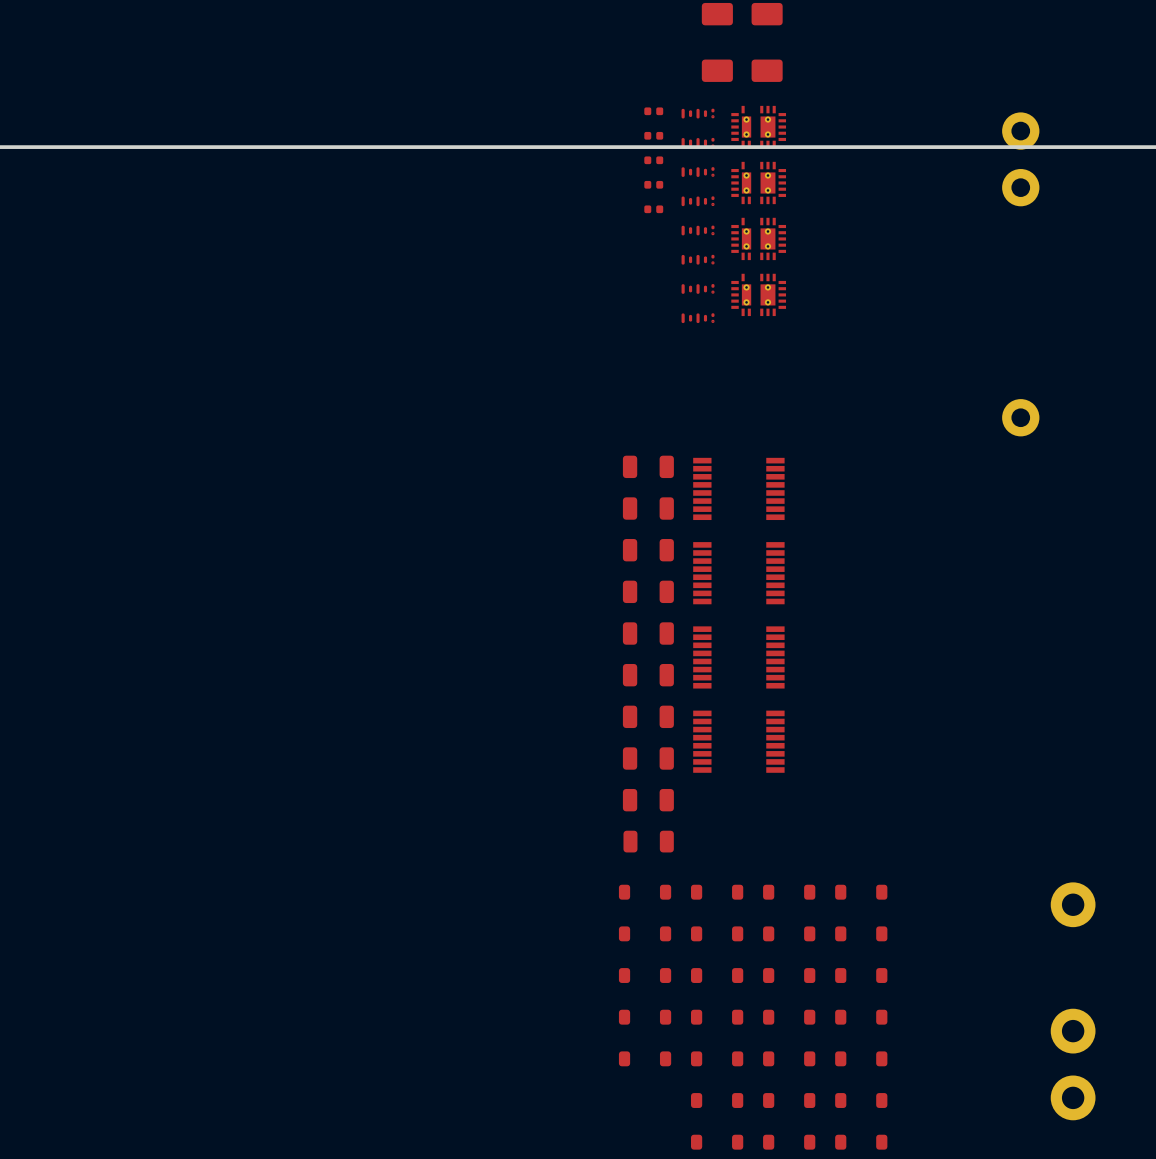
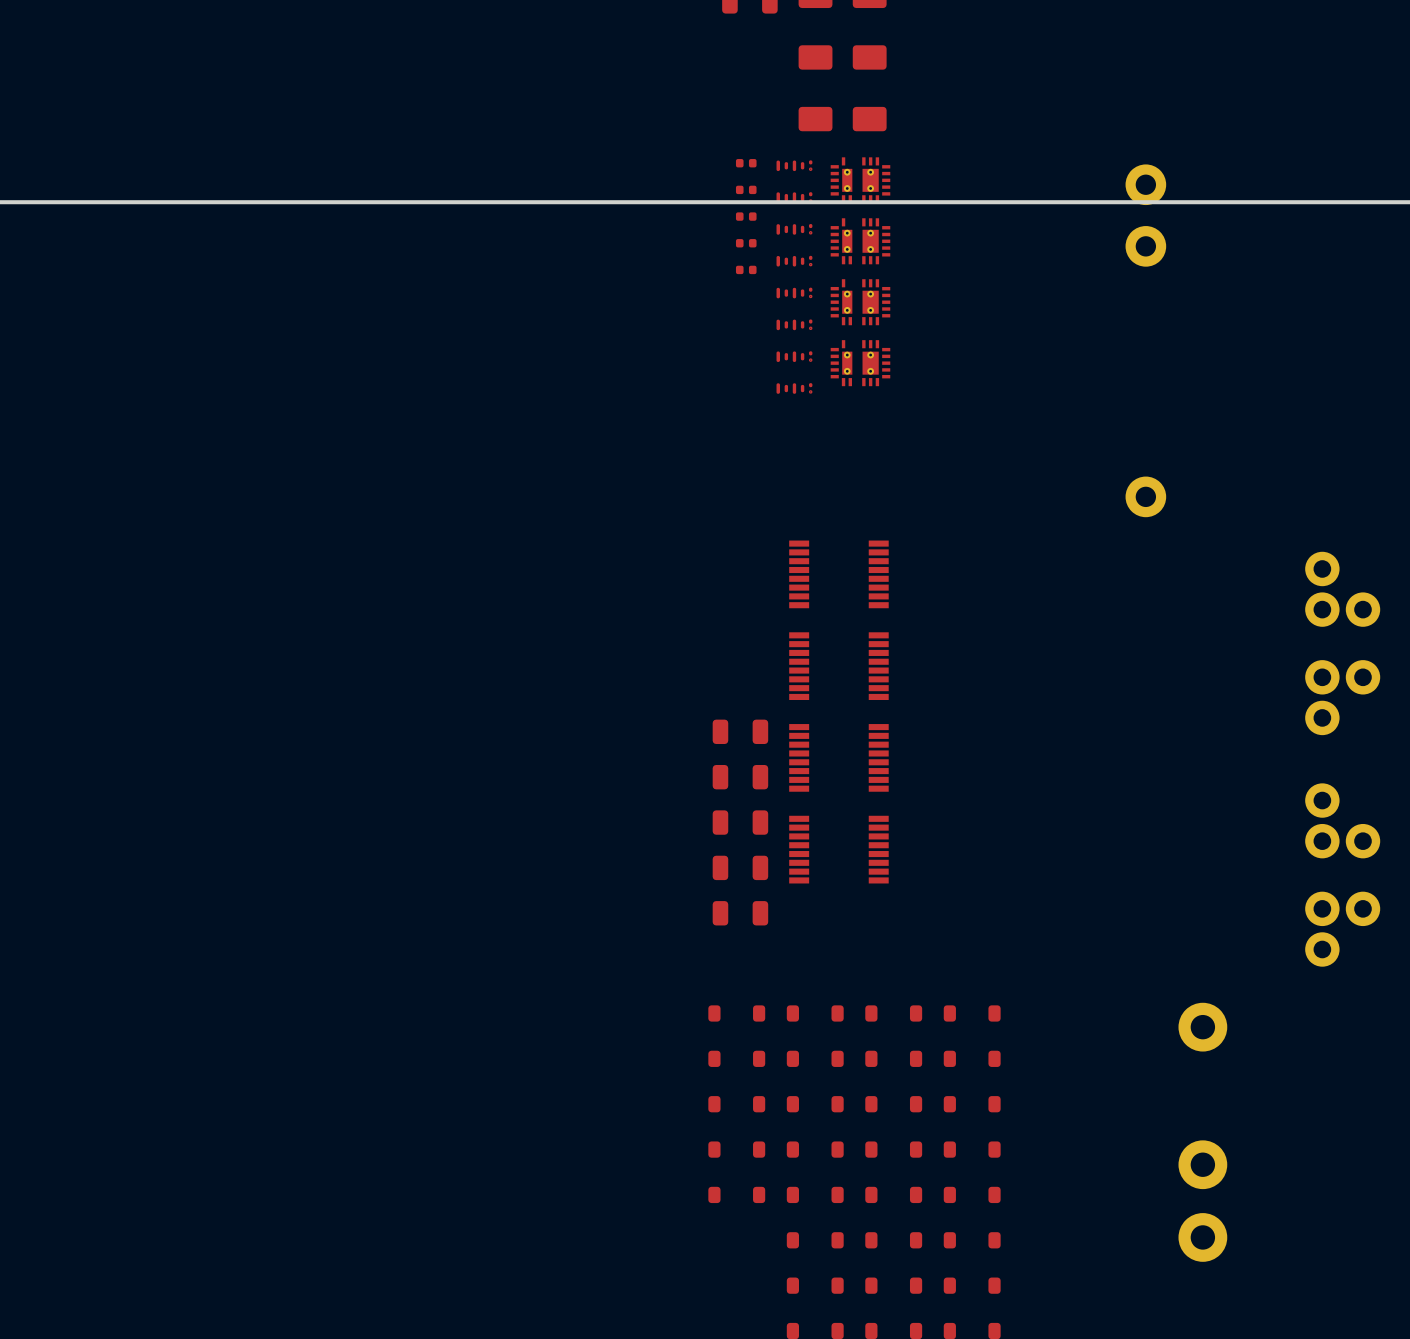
part: (648, 466) -> none
part: (648, 508) -> none
part: (648, 550) -> none
part: (648, 591) -> none
part: (648, 841) -> none

